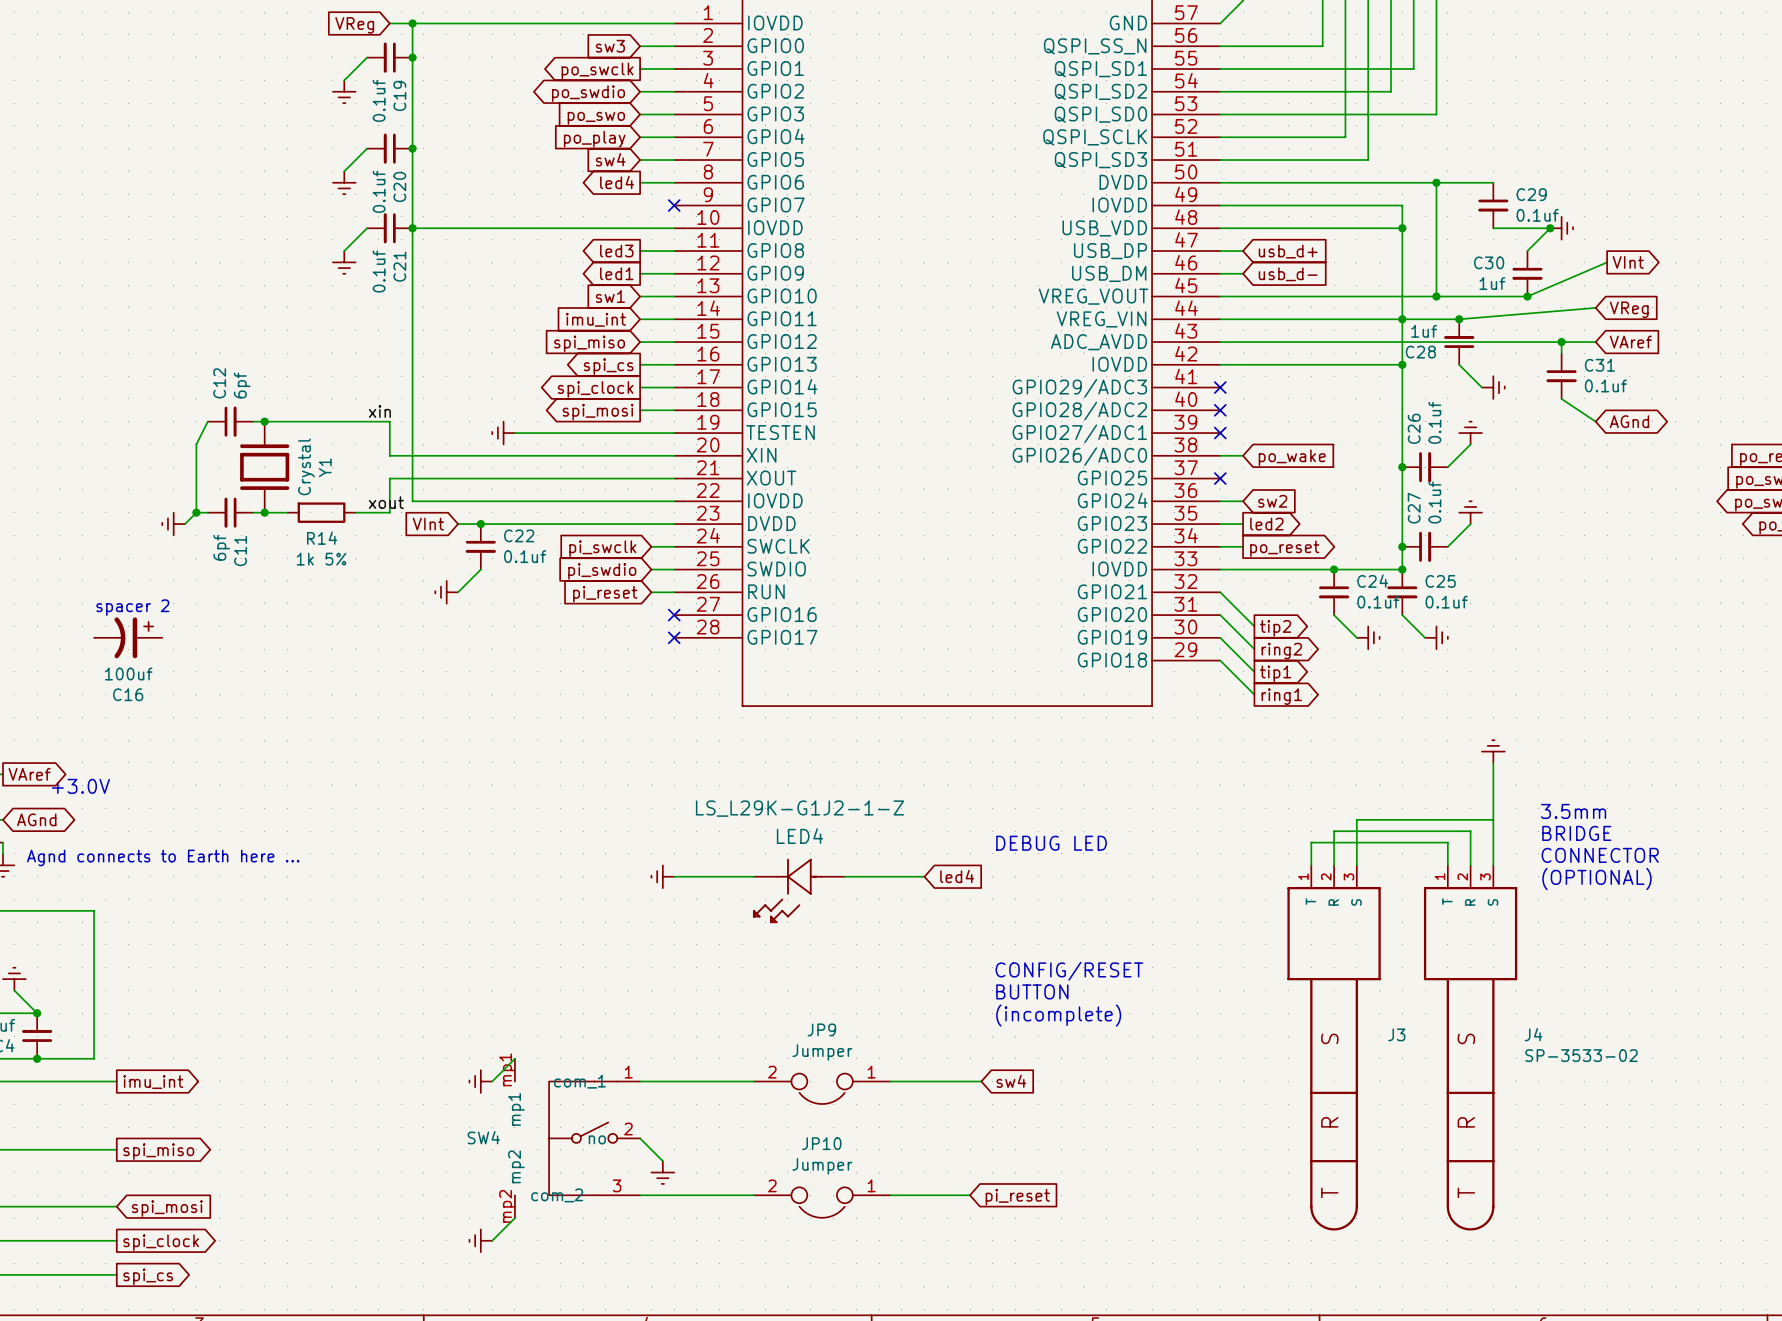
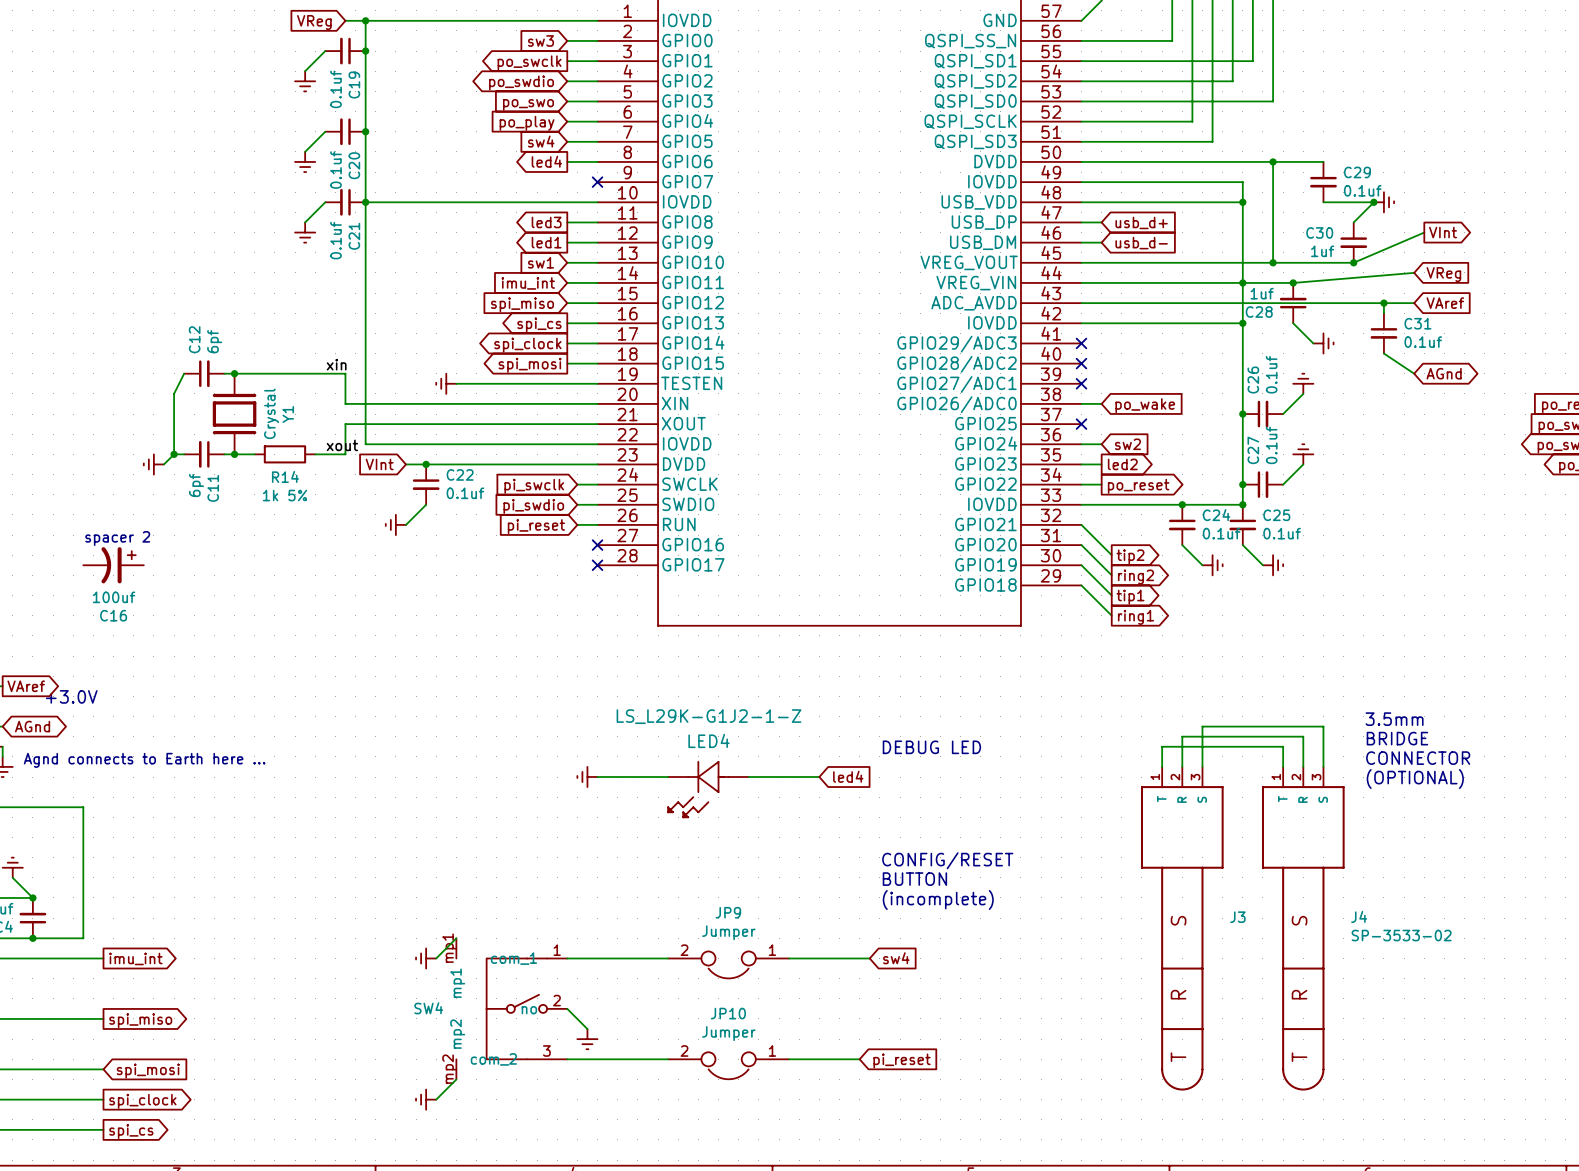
power symbol: (1493, 751) -> none
wire: (1493, 762) (1493, 819) -> none

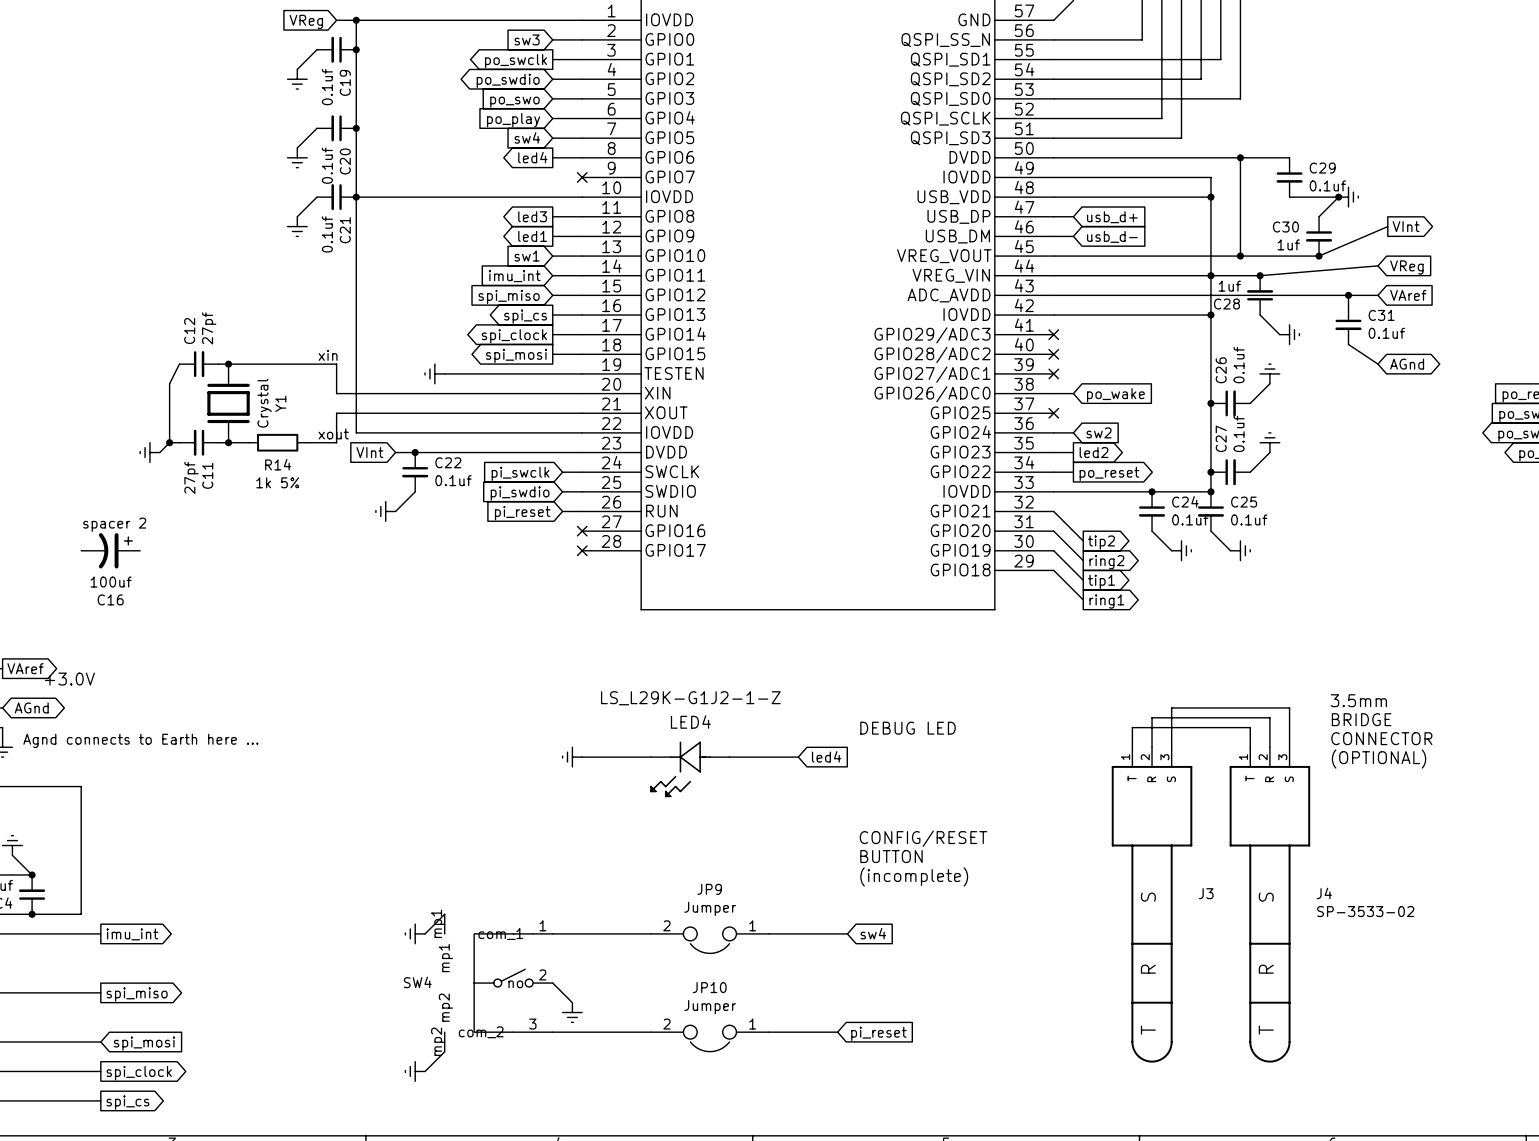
C12 value: 6pf (214, 341) -> 27pf (209, 328)
C11 value: 6pf (196, 485) -> 27pf (191, 477)

